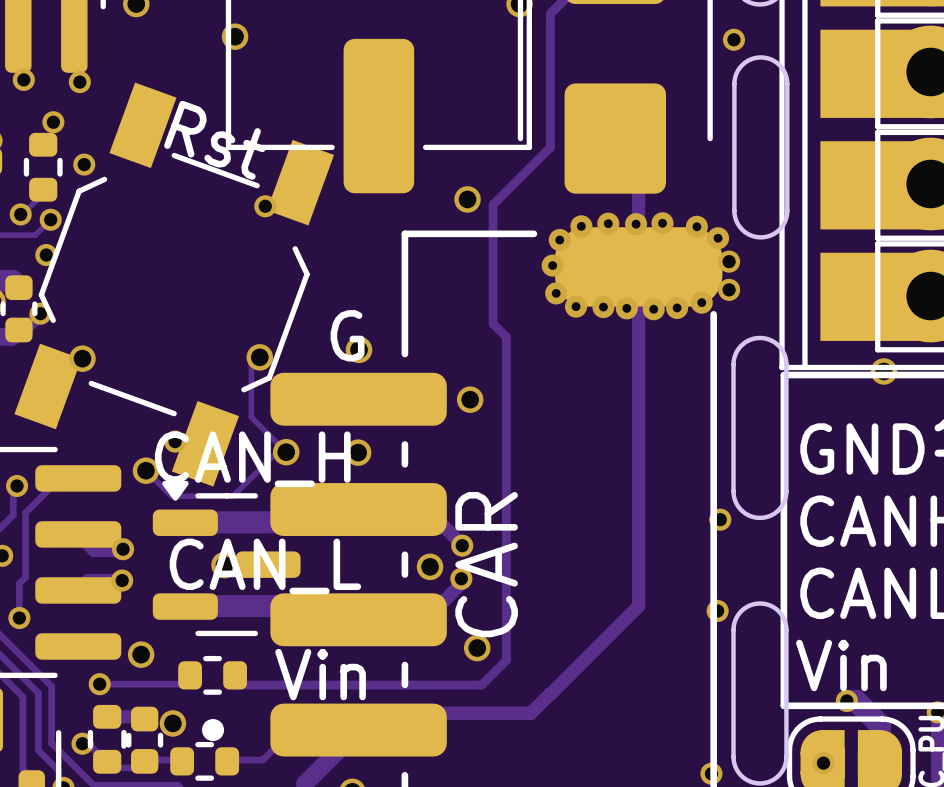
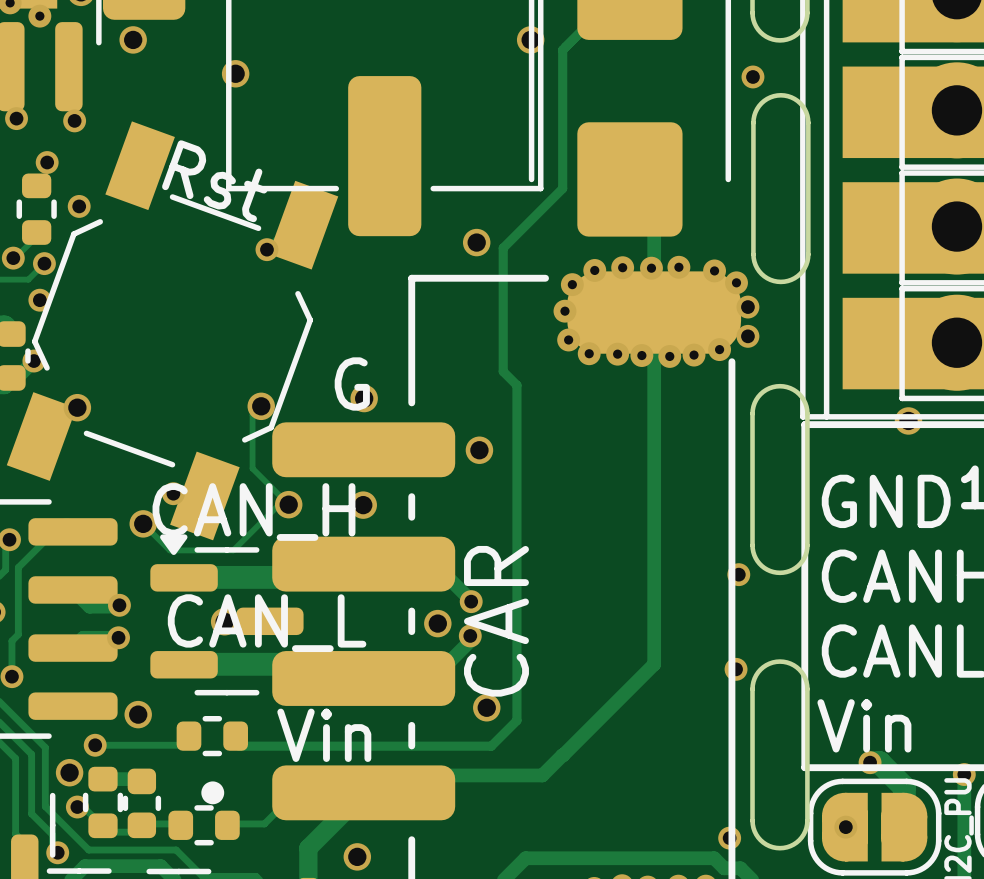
via position: (172, 723) -> (69, 772)

